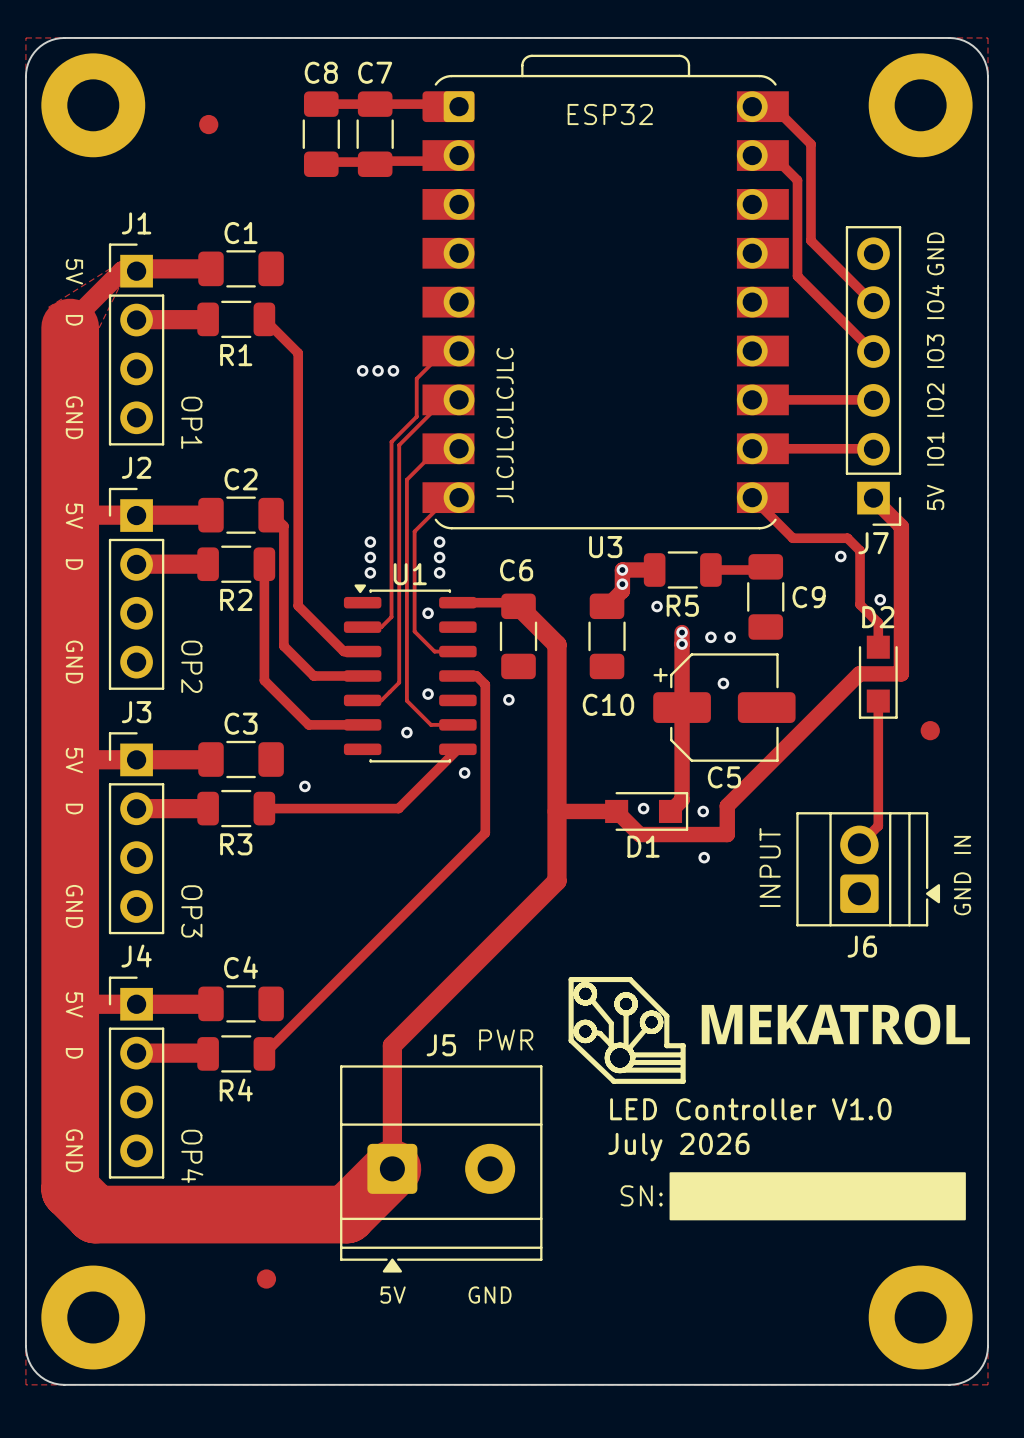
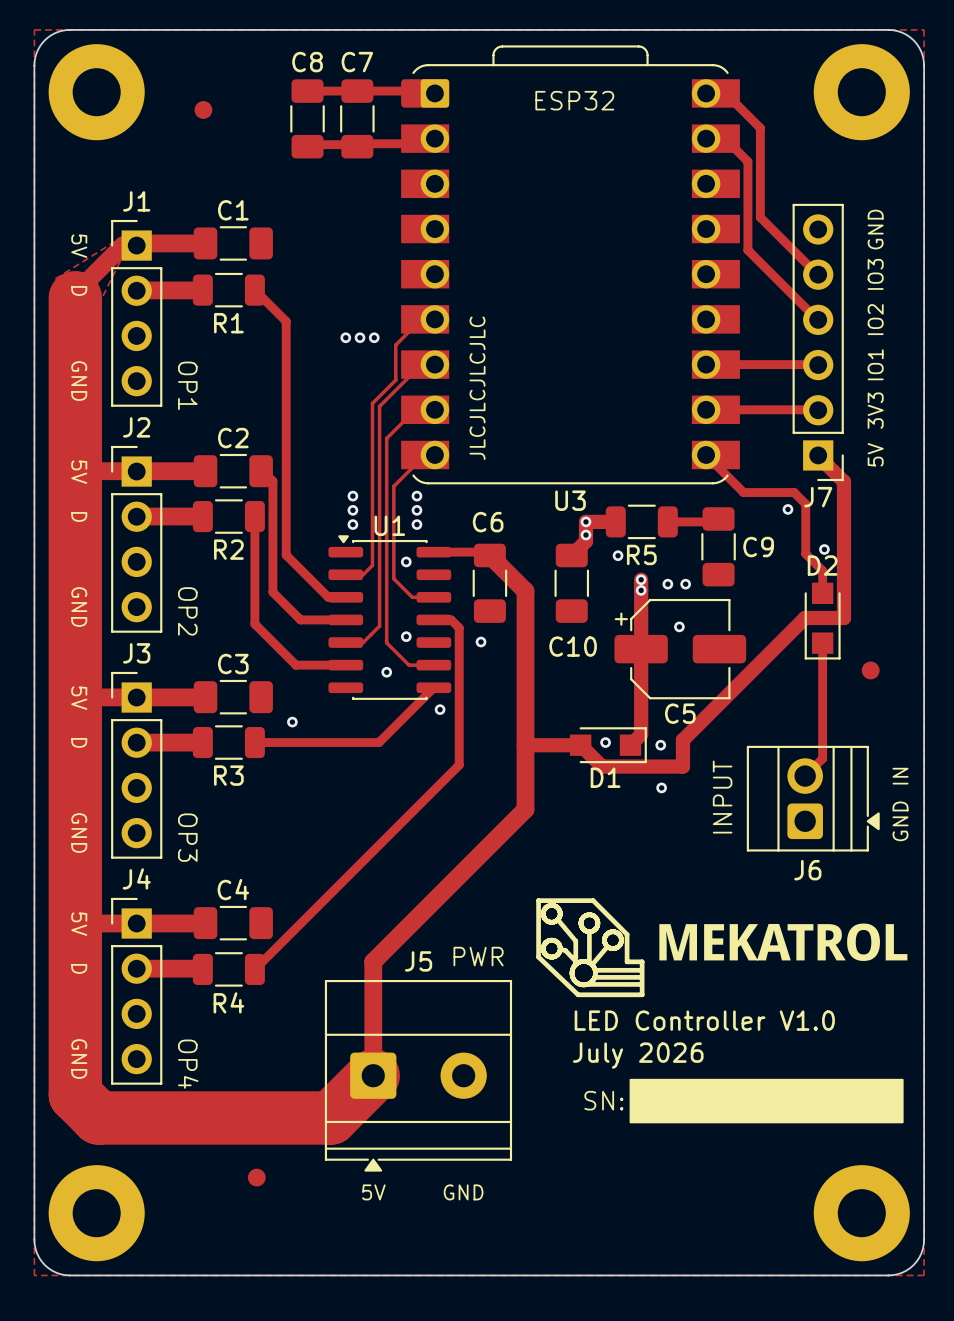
text: IO4 (935, 301) -> IO3 (875, 274)
text: IO3 (935, 351) -> IO2 (875, 319)
text: IO2 (935, 400) -> IO1 (875, 364)
text: IO1 (935, 448) -> 3V3 (875, 410)

